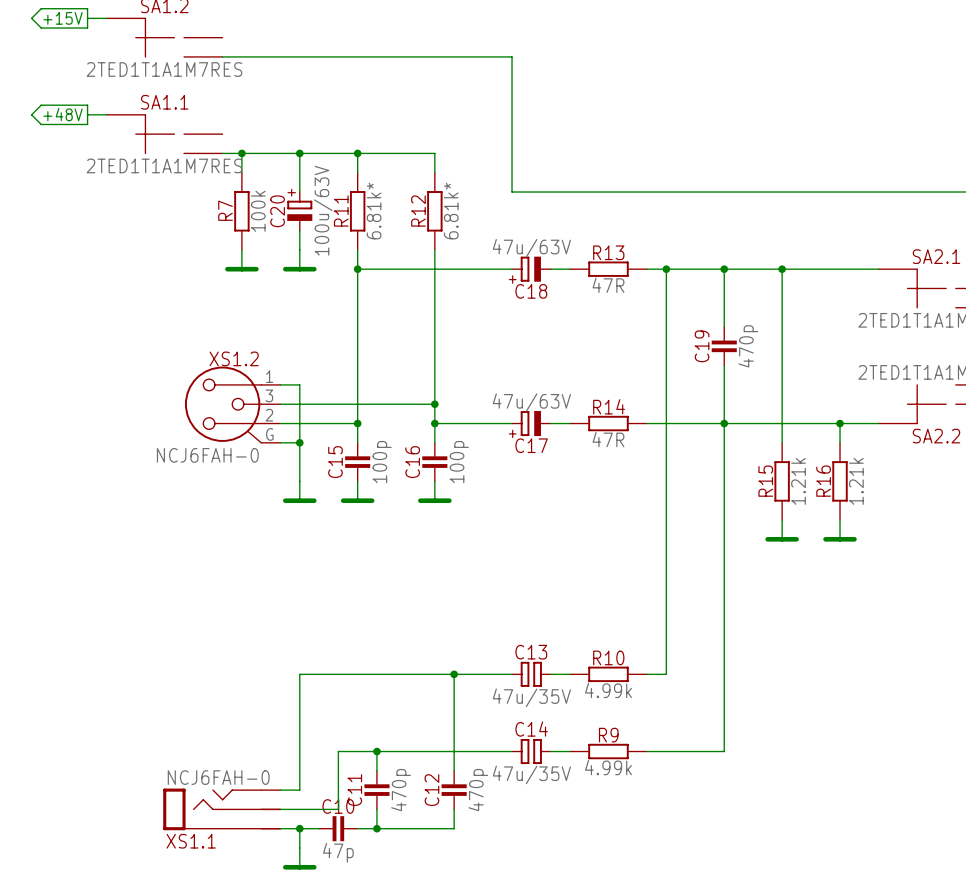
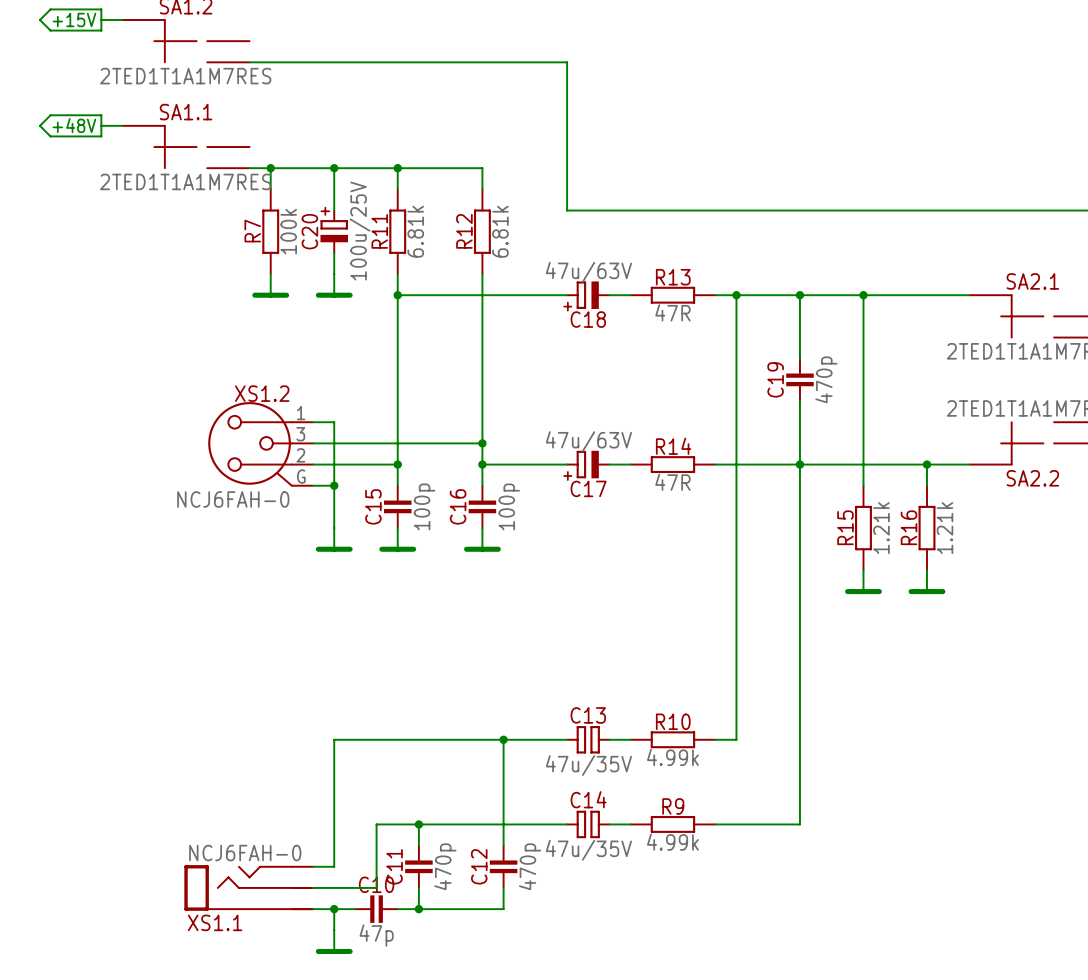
C20 value: 100u/63V (323, 210) -> 100u/25V (359, 231)
R11 value: 6.81k* (374, 211) -> 6.81k (415, 231)
R12 value: 6.81k* (451, 211) -> 6.81k (500, 231)

